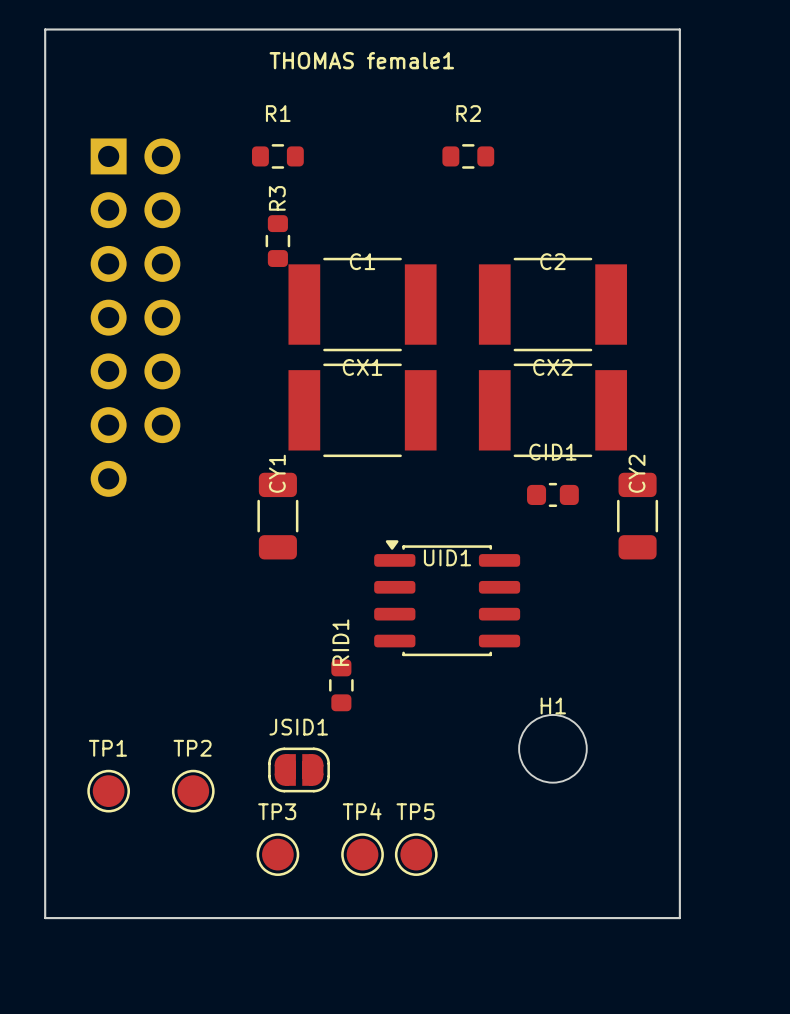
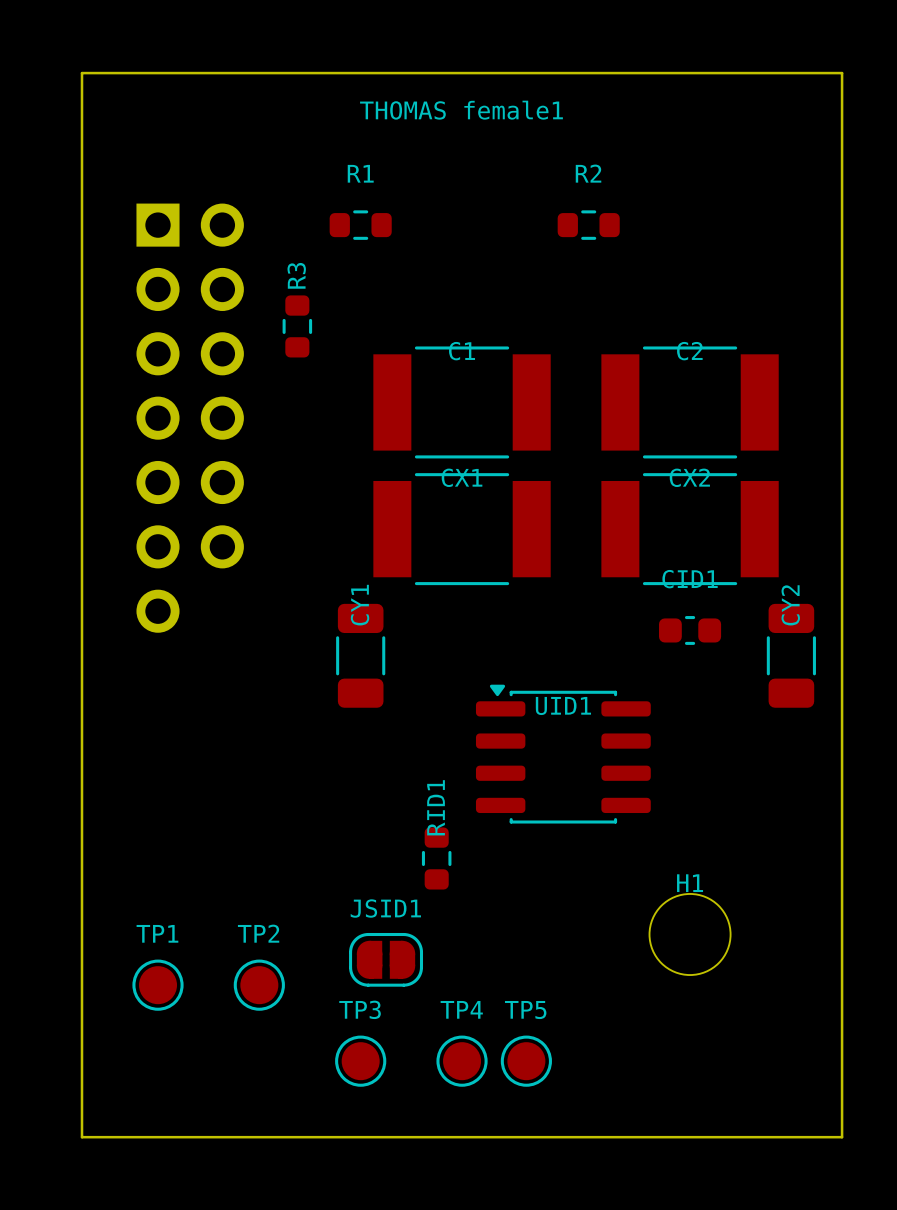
R3 position: (277, 241) -> (297, 326)

